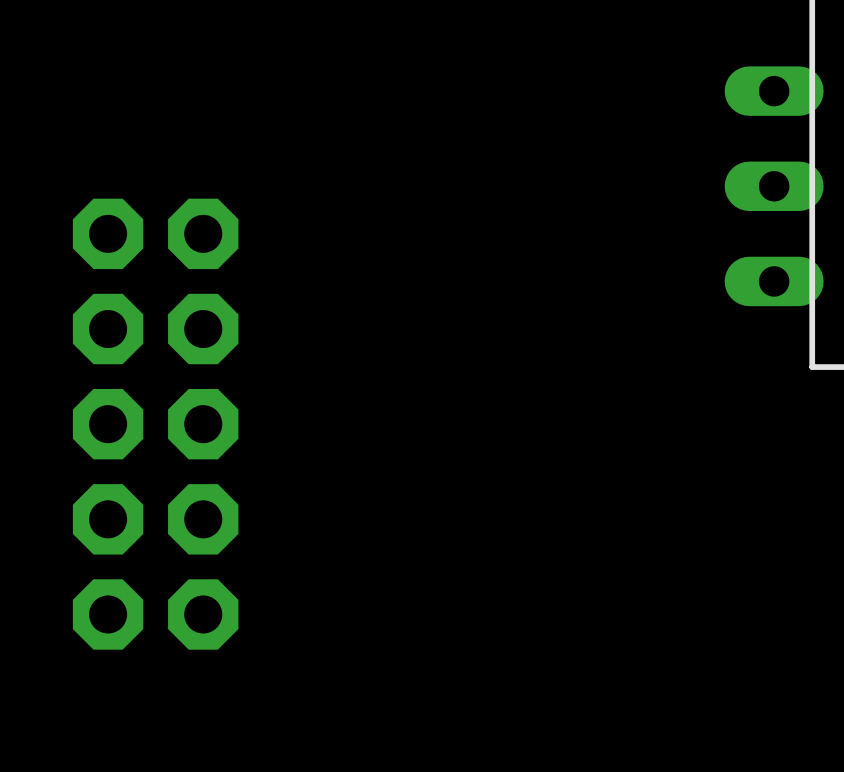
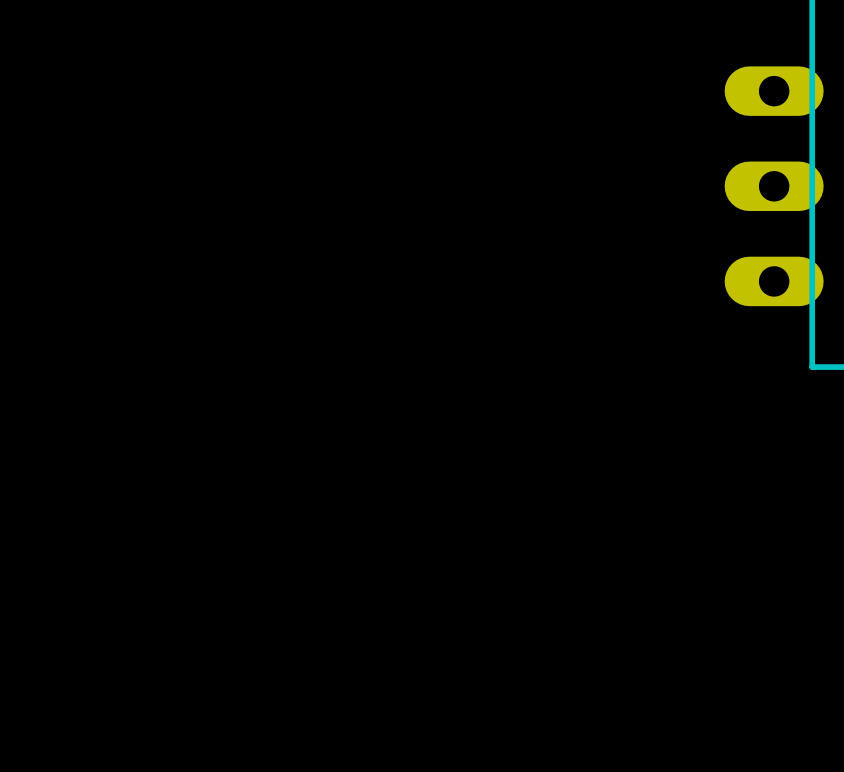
part: (155, 424) -> none

